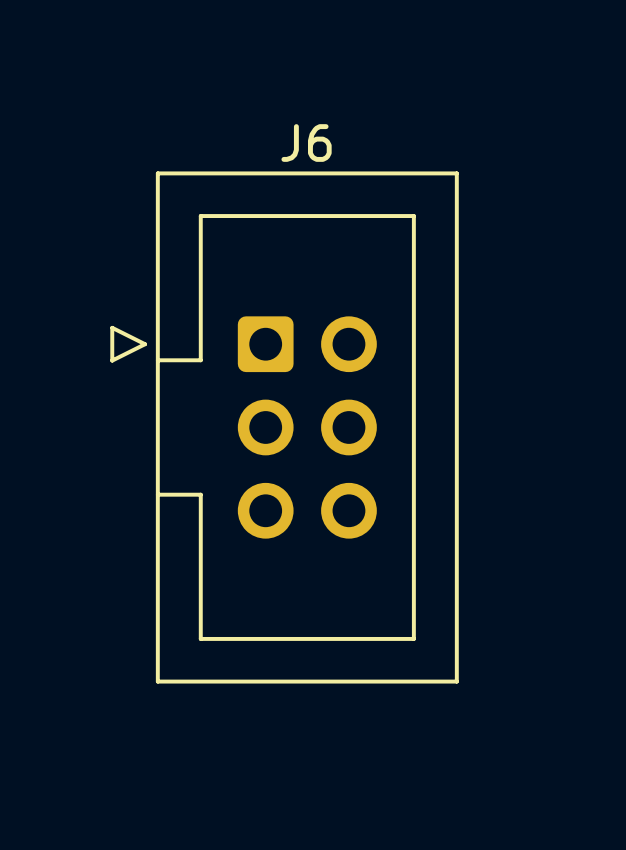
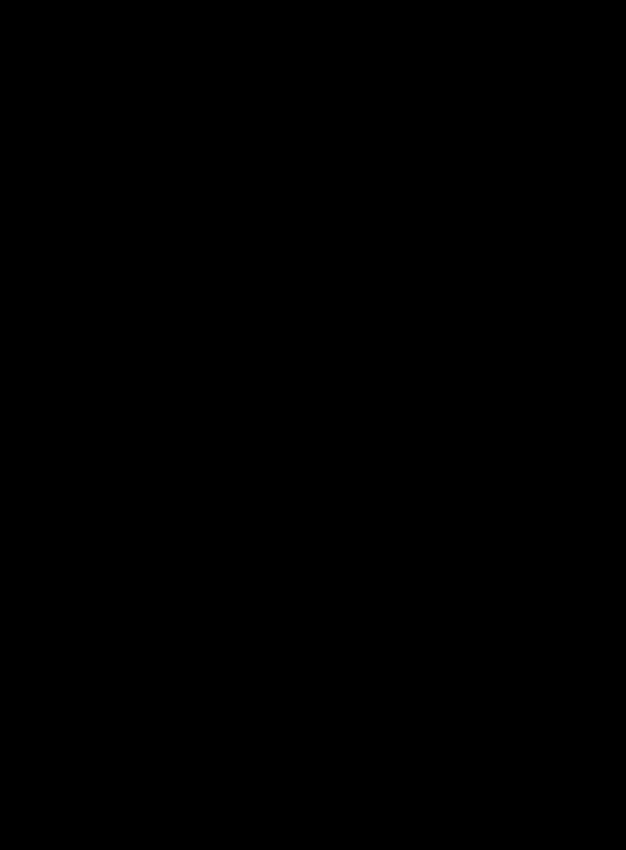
J6: (284, 427) -> none

